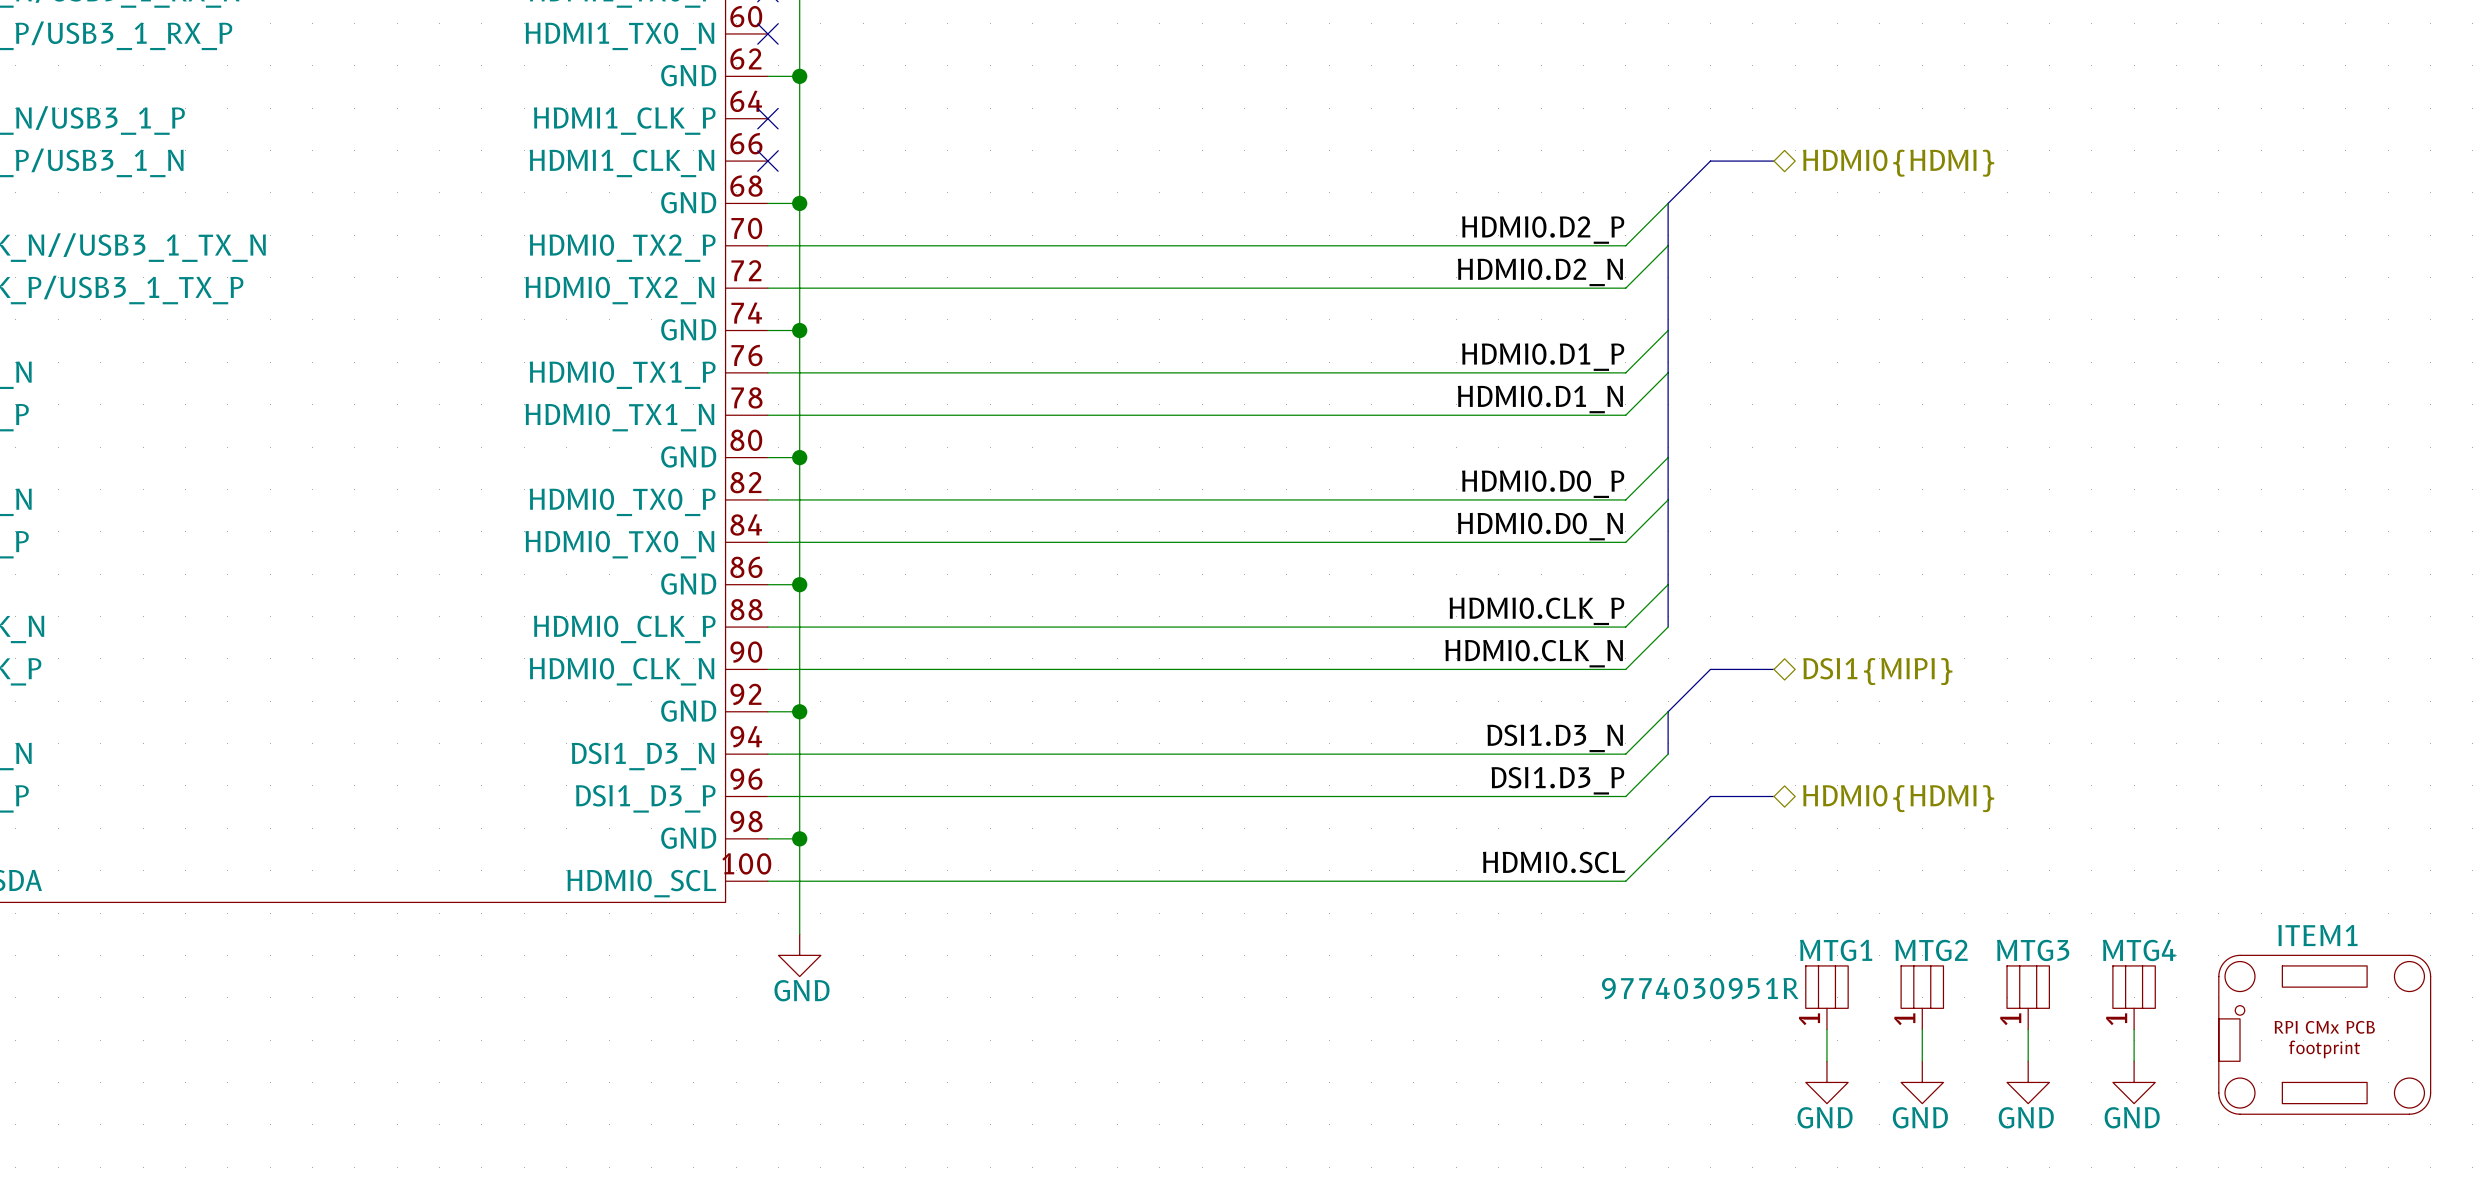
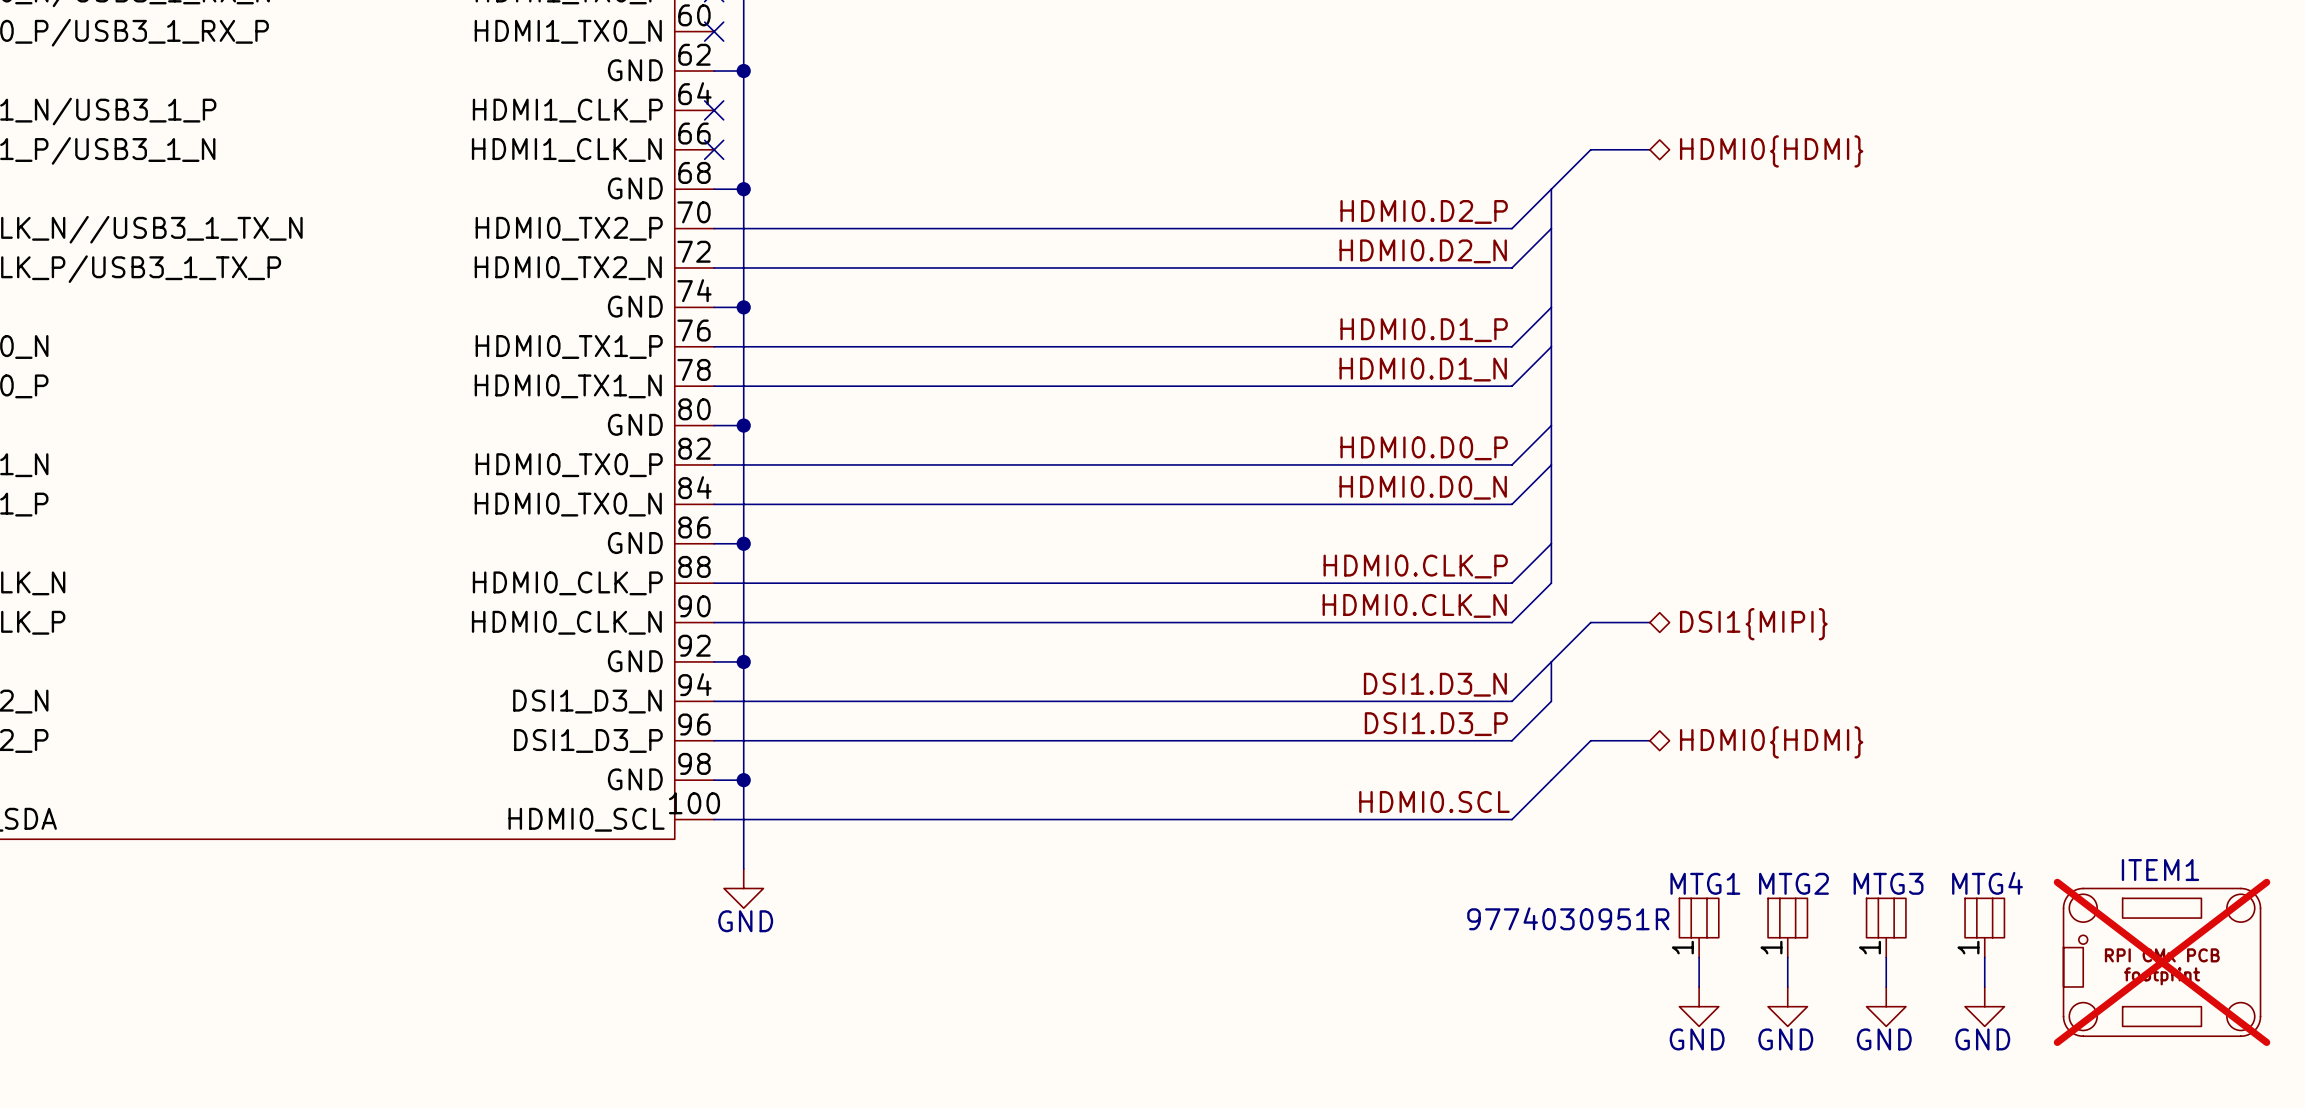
ITEM1 do-not-place cross: none -> (2162, 962)

